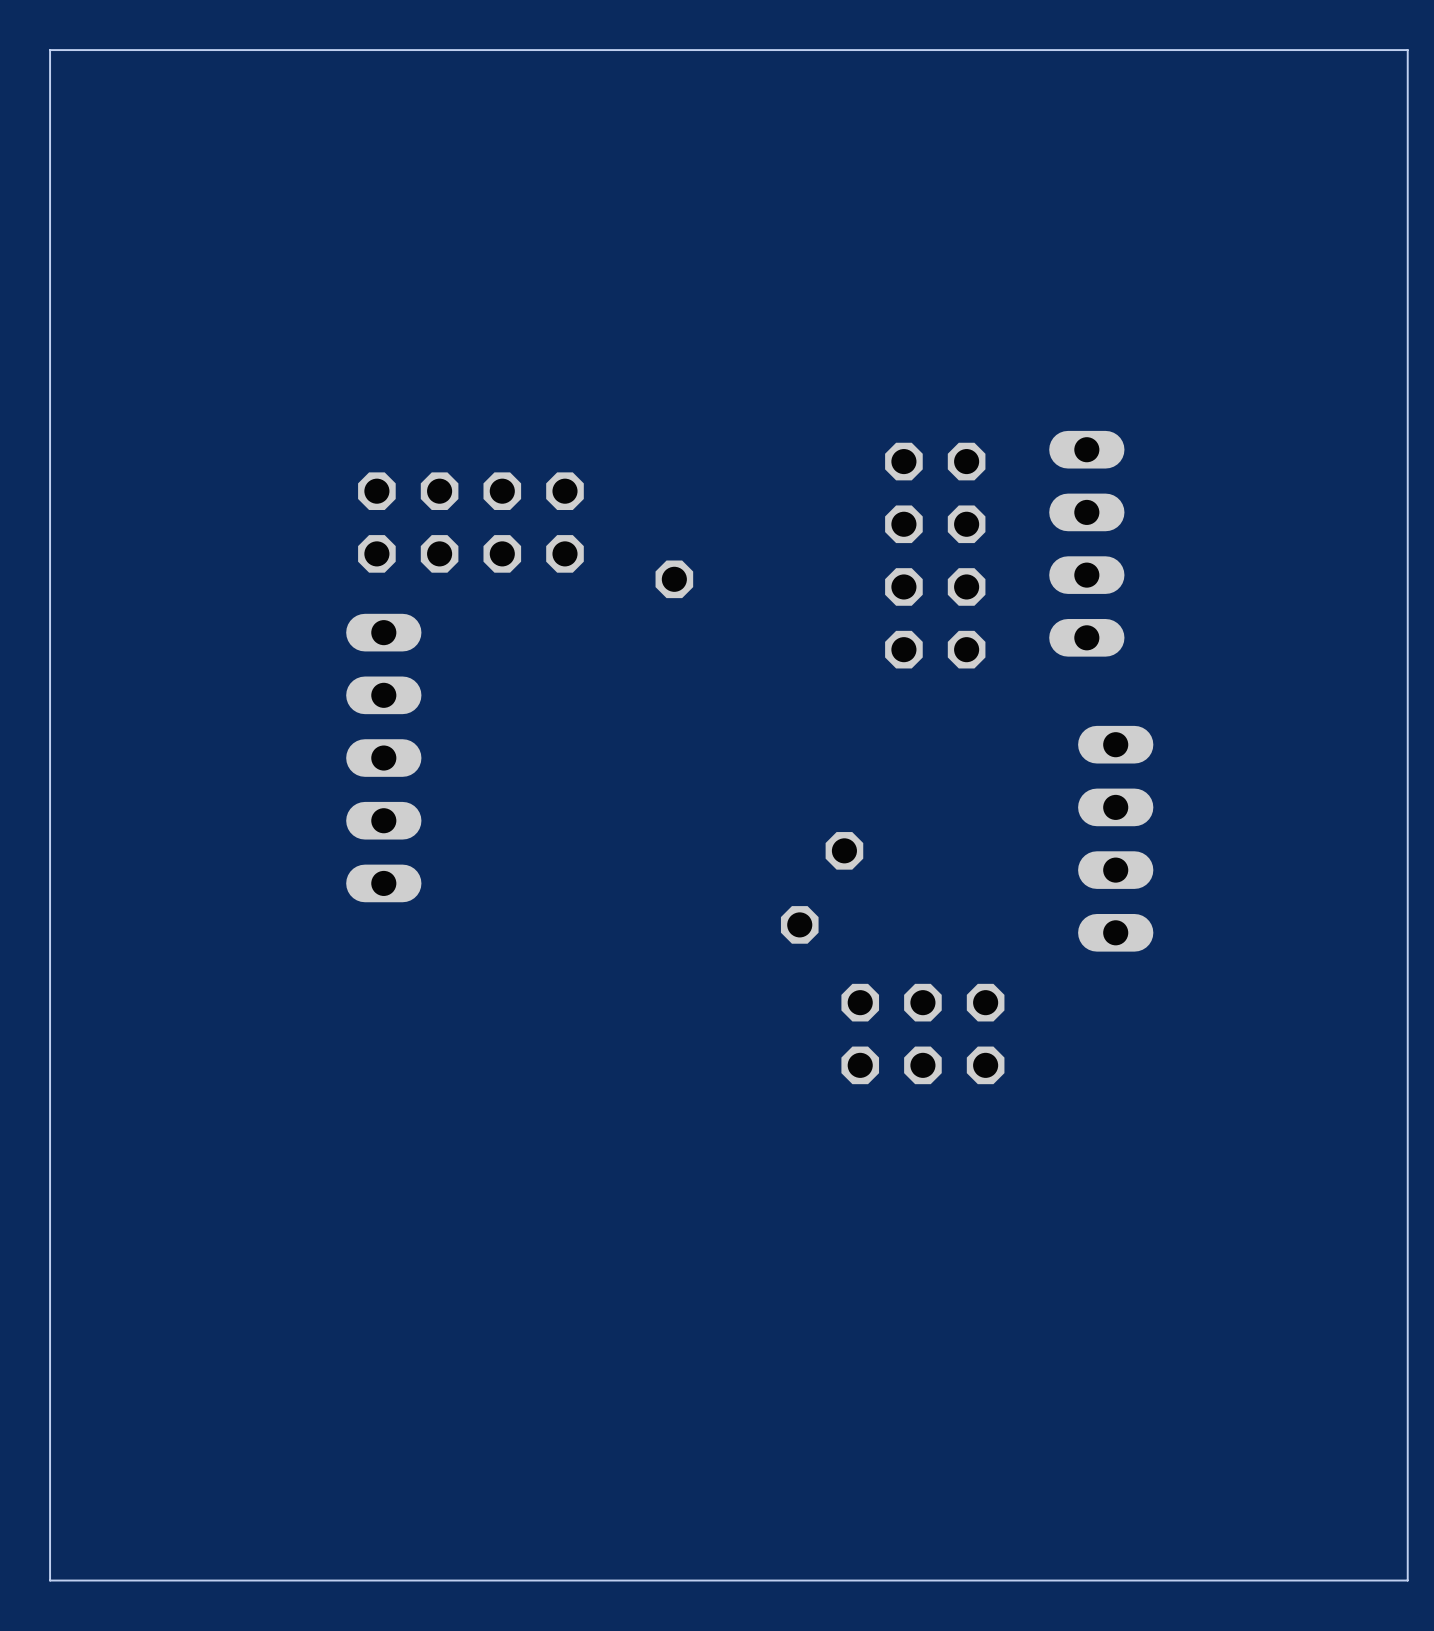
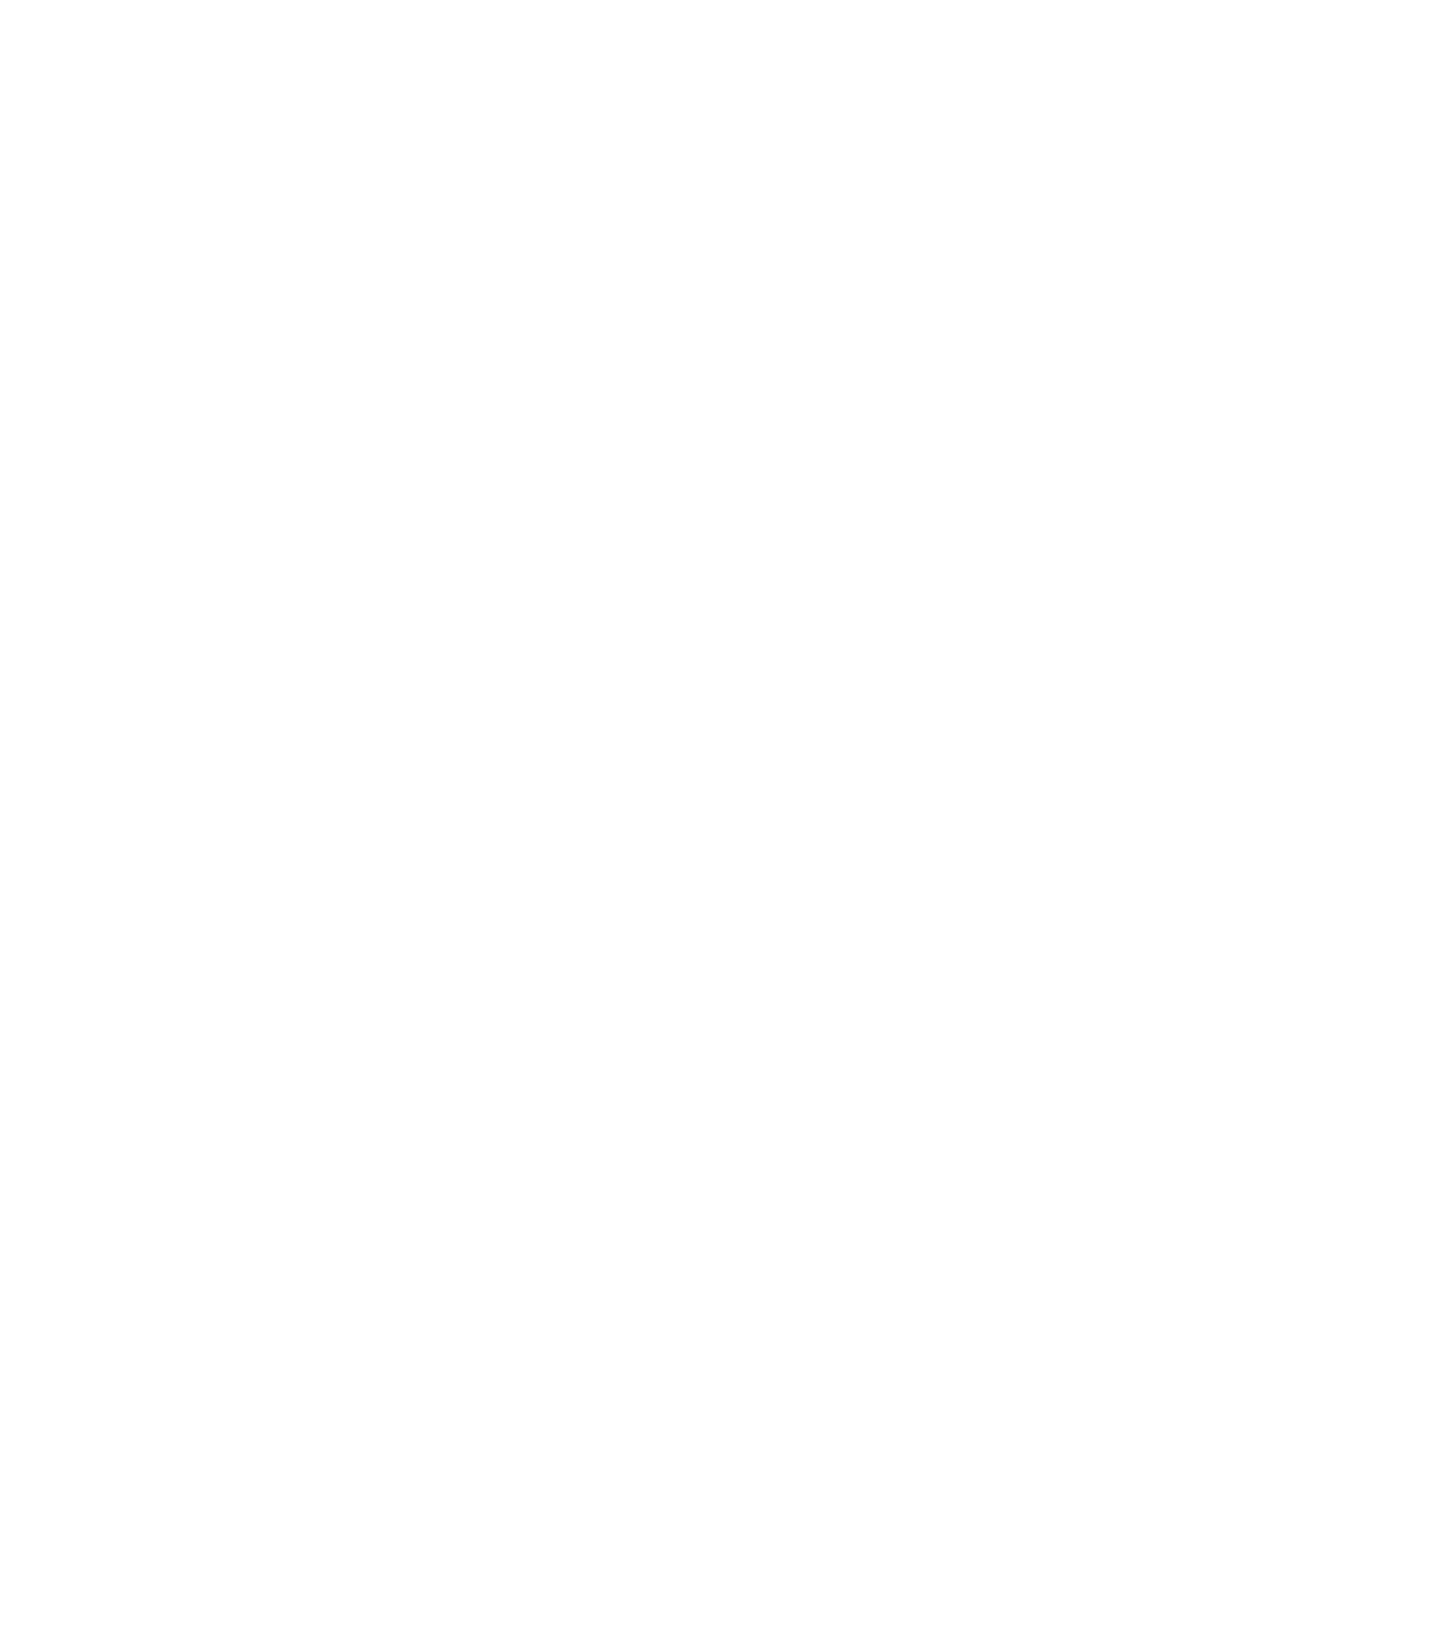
board edge: (1407, 50) (50, 50) (50, 1580) (1407, 1580) (1407, 50) -> none
part: (470, 522) -> none
part: (1086, 543) -> none
part: (935, 555) -> none
part: (674, 579) -> none
part: (383, 758) -> none
part: (1115, 838) -> none
part: (844, 850) -> none
part: (799, 924) -> none
part: (922, 1034) -> none

